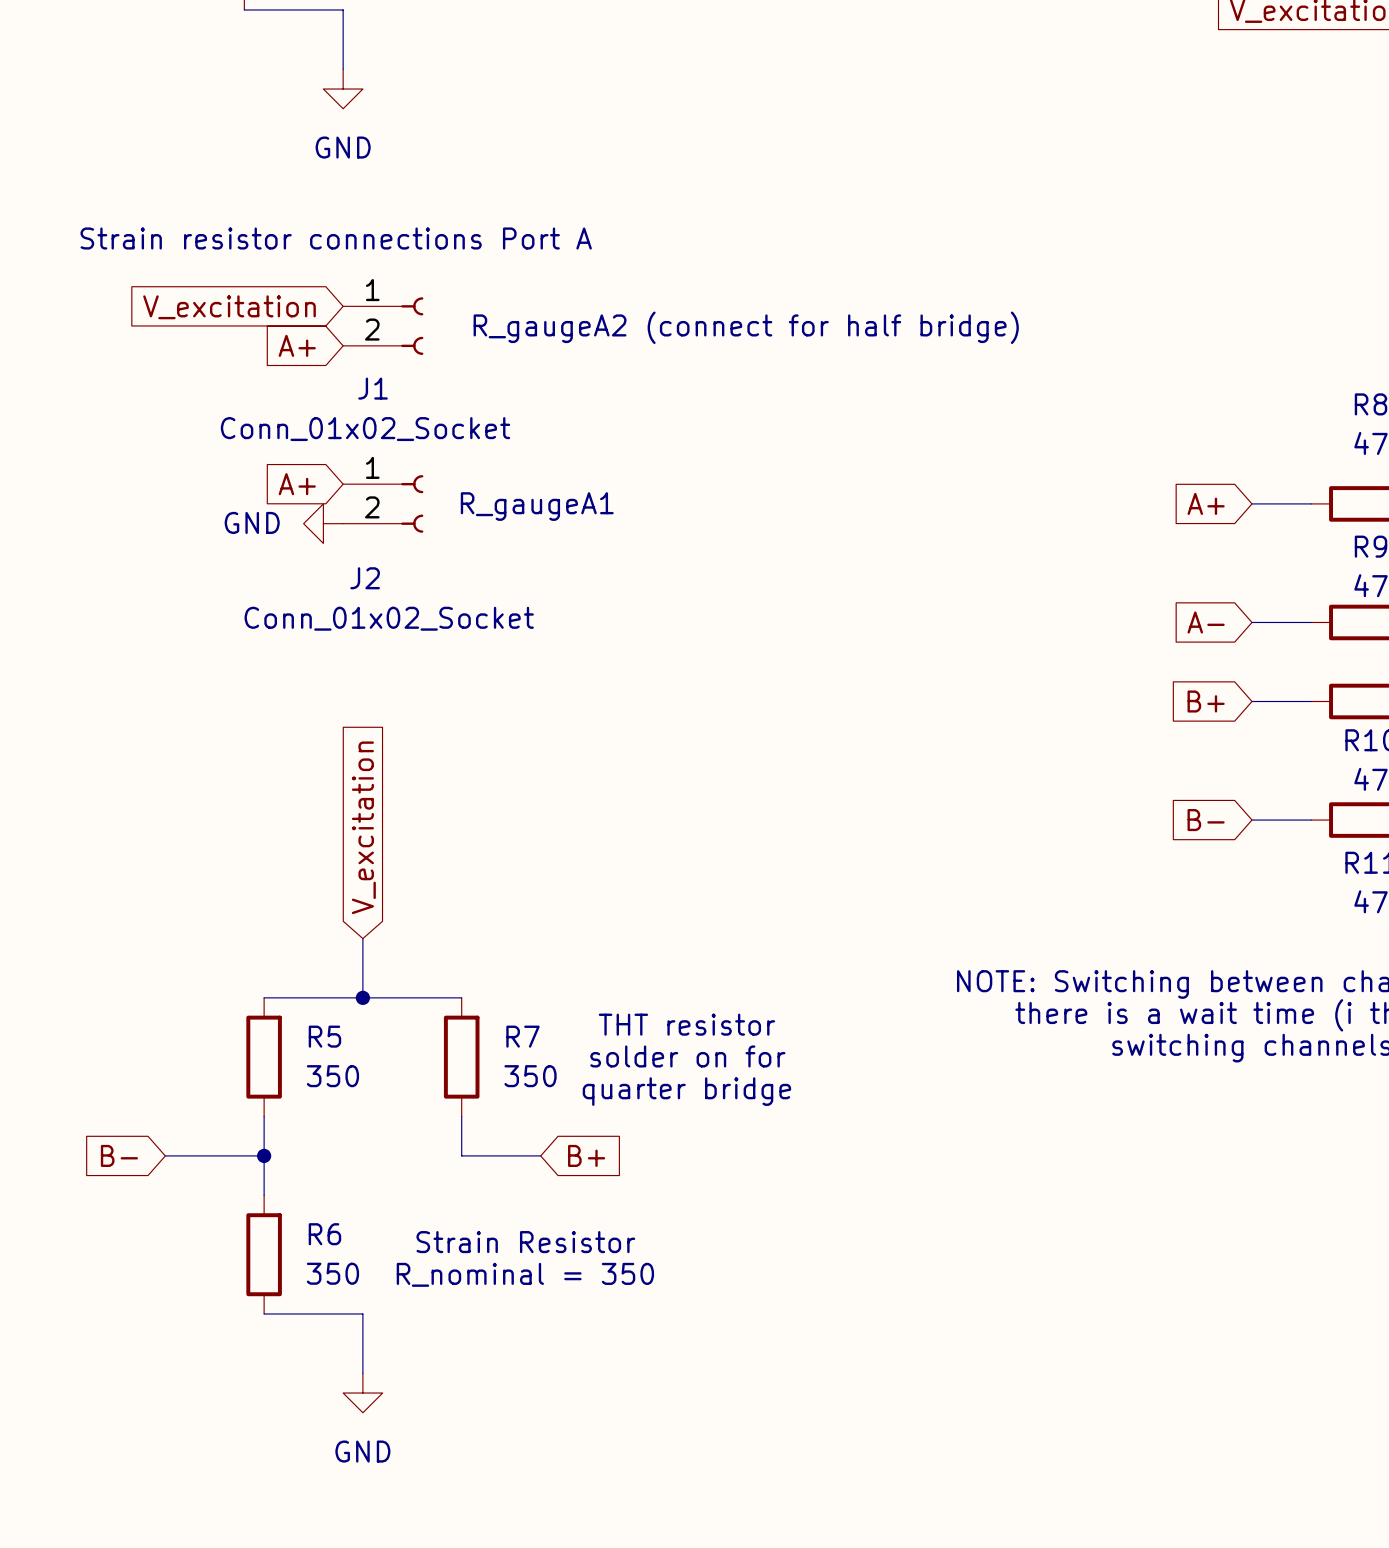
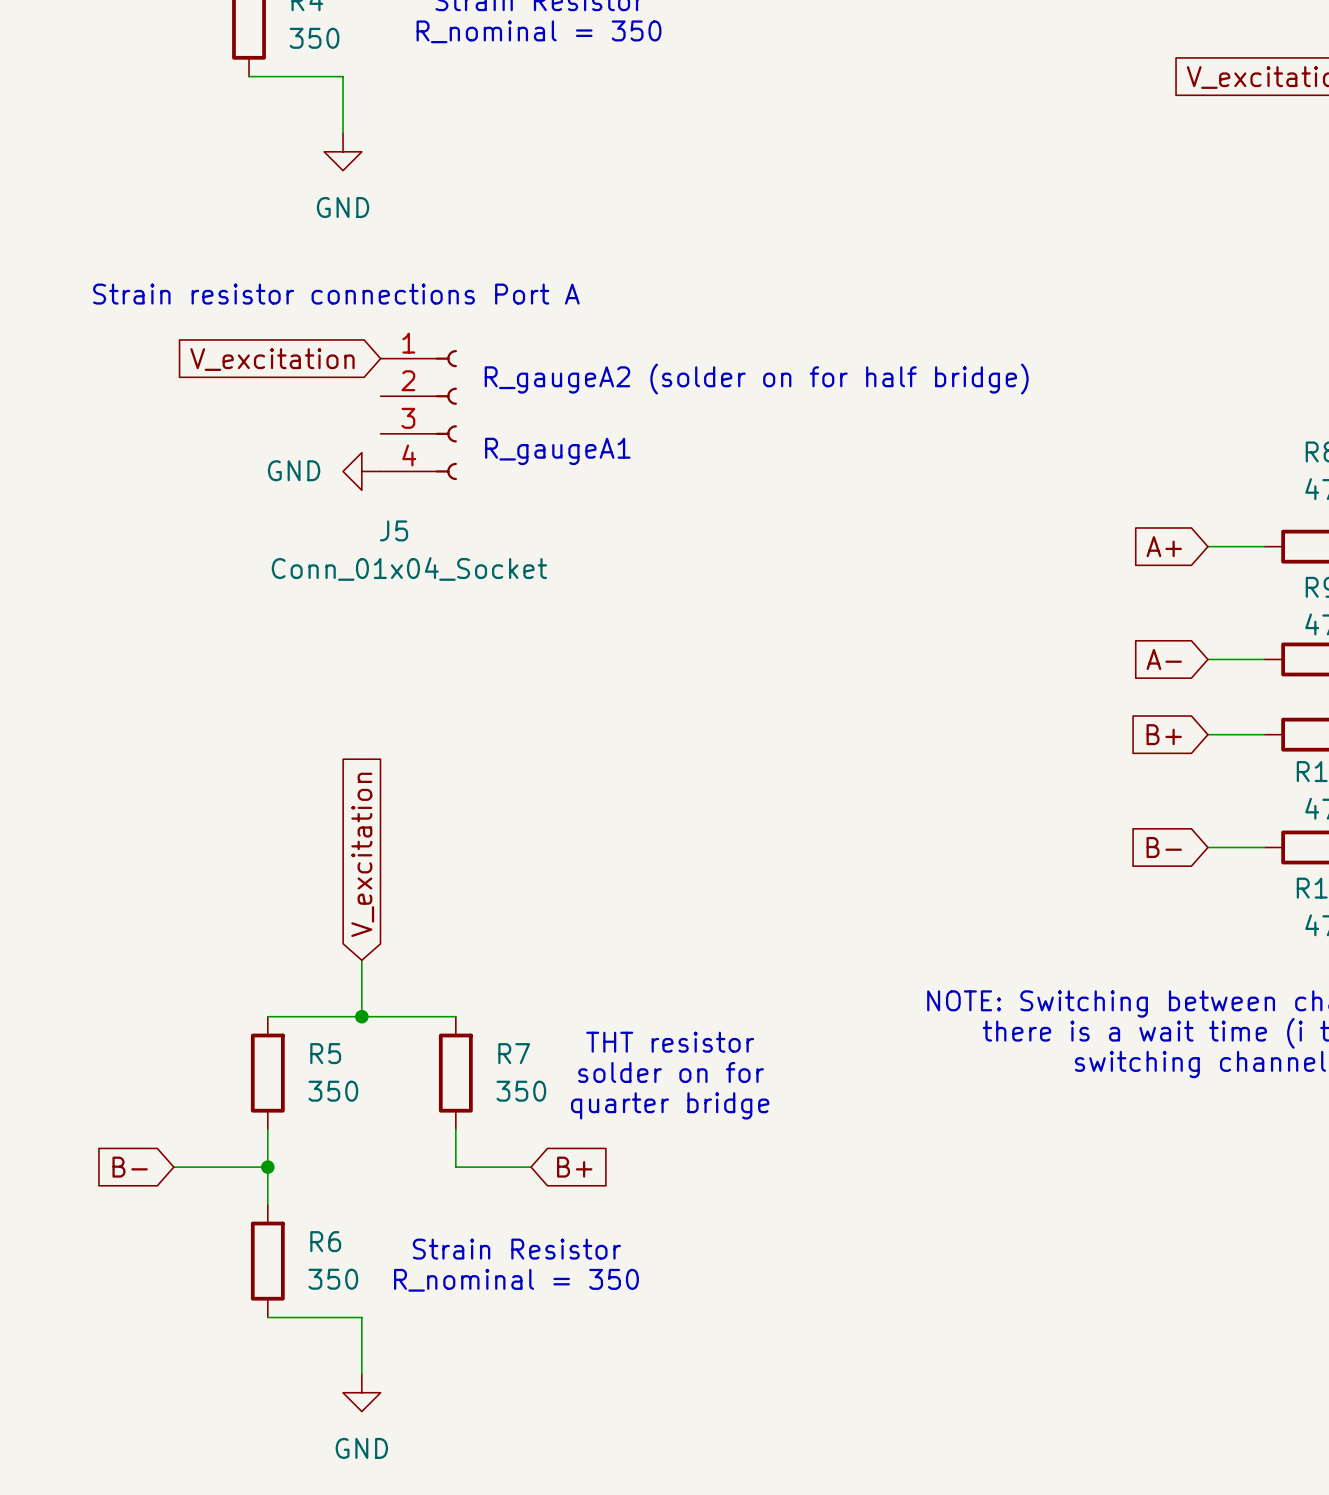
global label position: V_excitation (229, 307) -> V_excitation (272, 359)
J1: Conn_01x02_Socket (383, 326) -> none
text: R_gaugeA2 (connect for half bridge) (746, 327) -> R_gaugeA2 (solder on for half bridge) (756, 379)
global label: A+ (297, 345) -> none
J5: none -> Conn_01x04_Socket (418, 415)
global label: A+ (297, 484) -> none
J2: Conn_01x02_Socket (383, 503) -> none
text position: R_gaugeA1 (537, 506) -> R_gaugeA1 (557, 451)
power symbol position: GND (323, 523) -> GND (361, 471)

